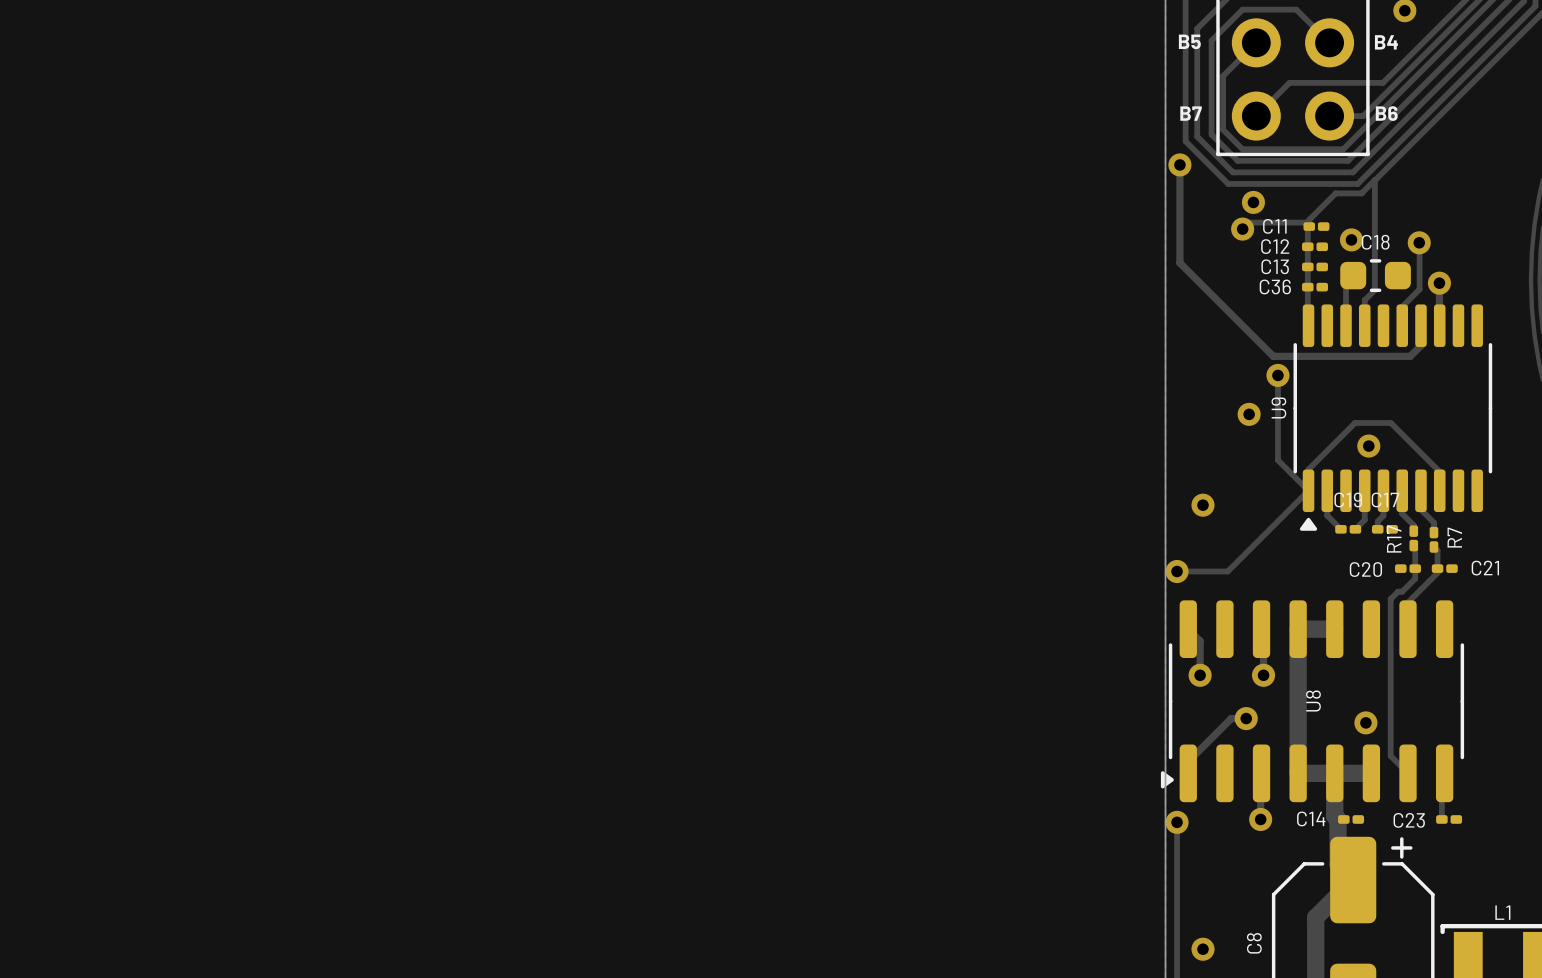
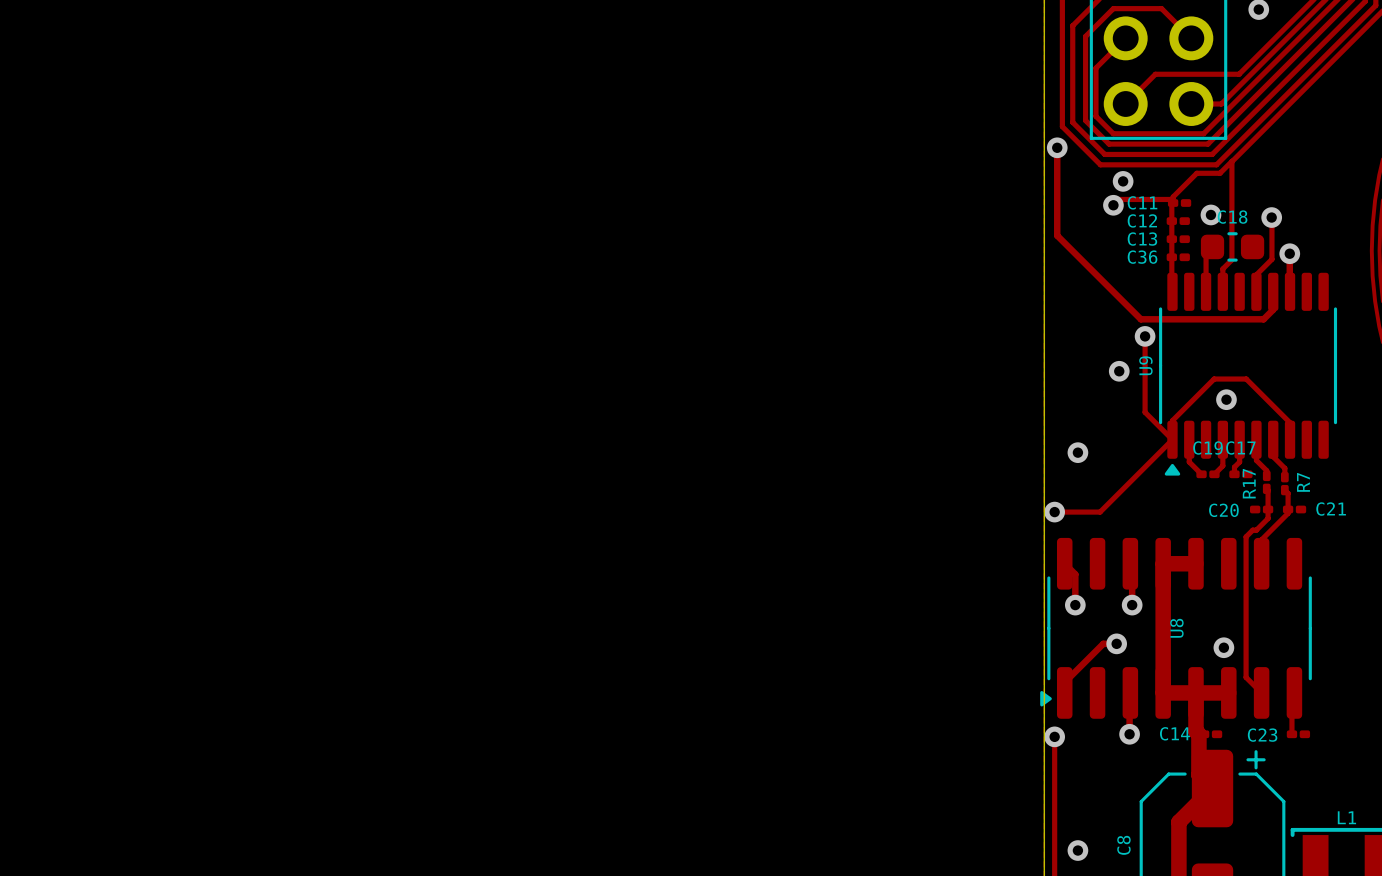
text: B5 (1189, 41) -> none
text: B4 (1386, 42) -> none
text: B7 (1191, 113) -> none
text: B6 (1386, 113) -> none

